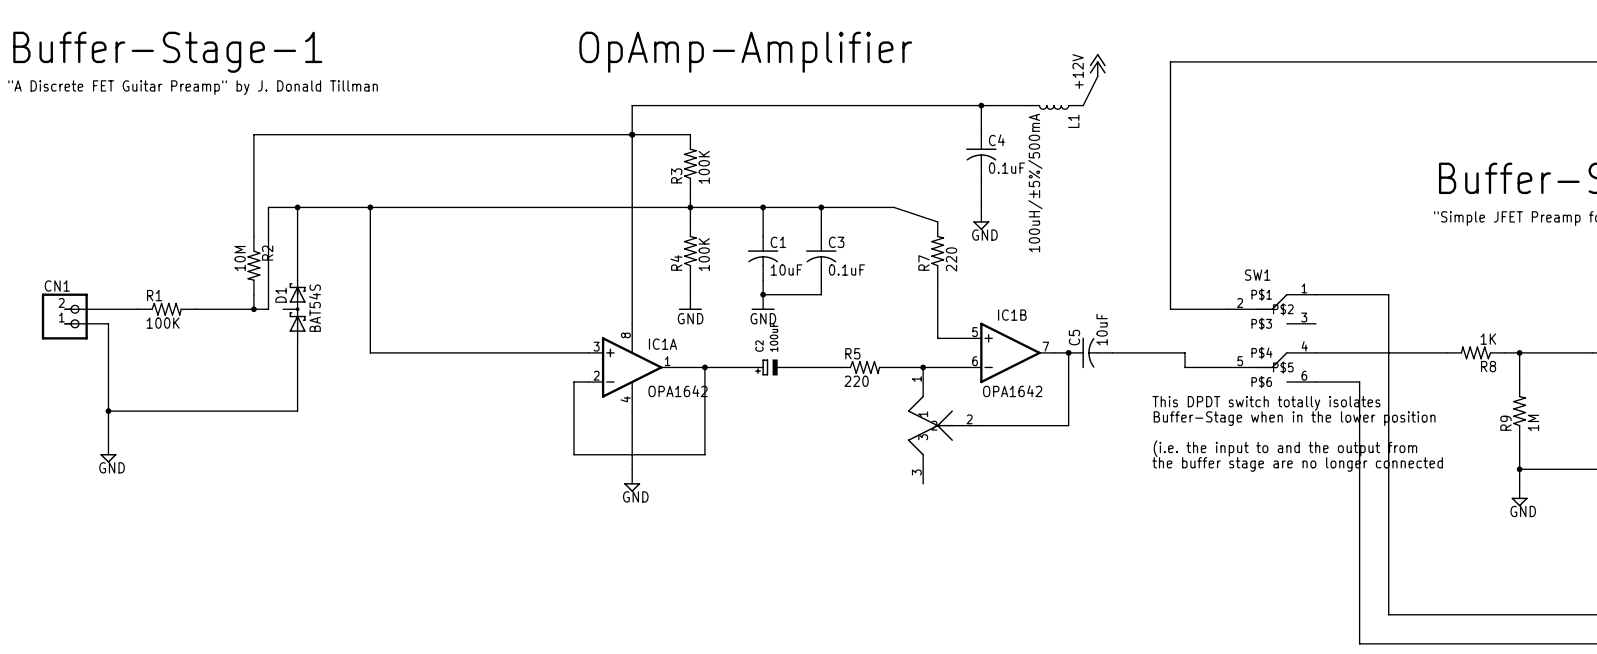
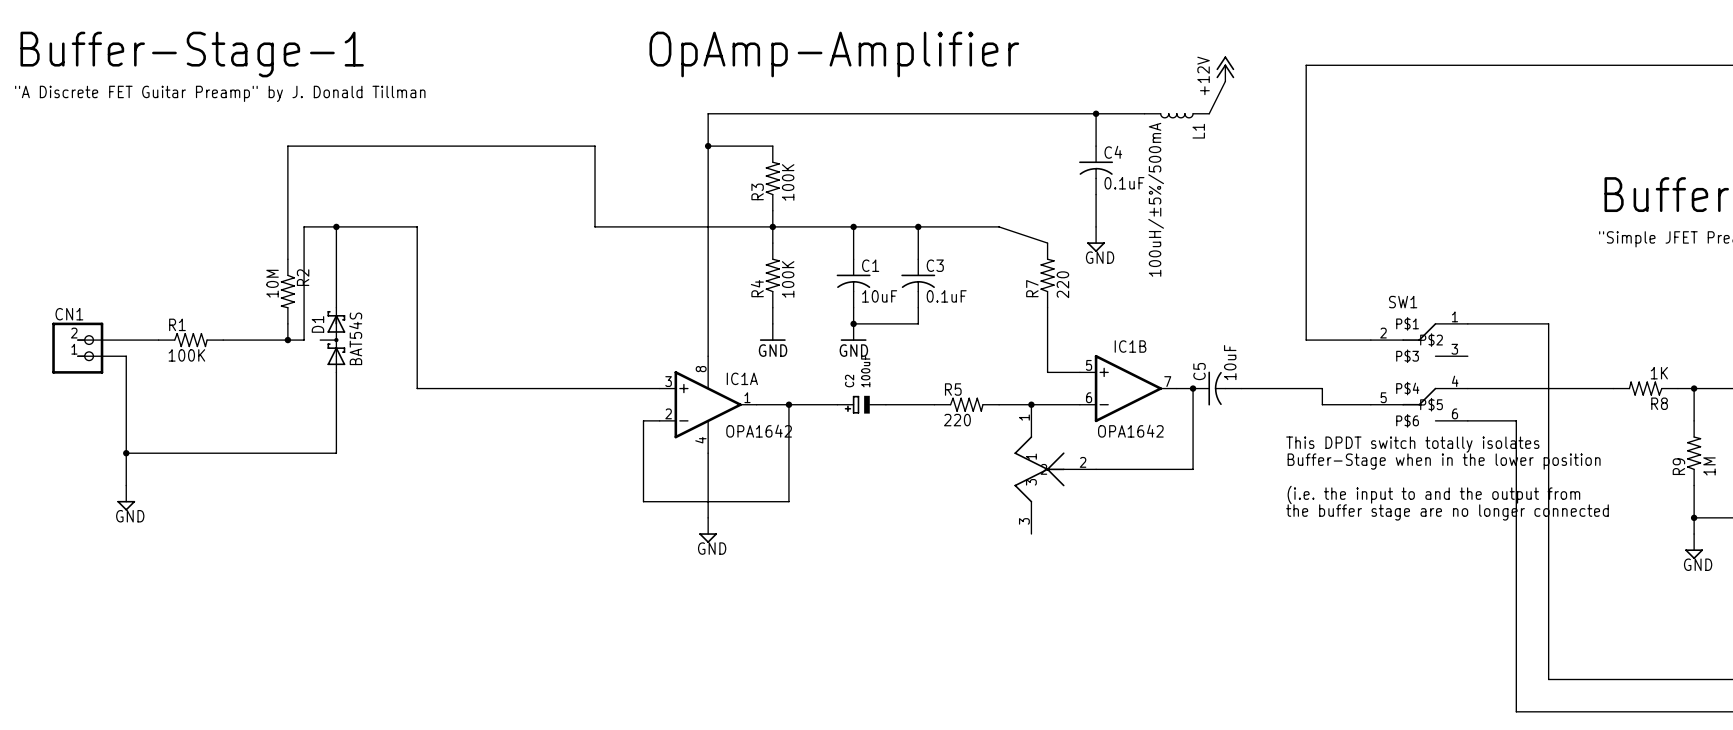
wire: (530, 134) (632, 134) -> (595, 146) (595, 226)
wire: (370, 207) (530, 207) -> none
junction: (370, 207) -> none

